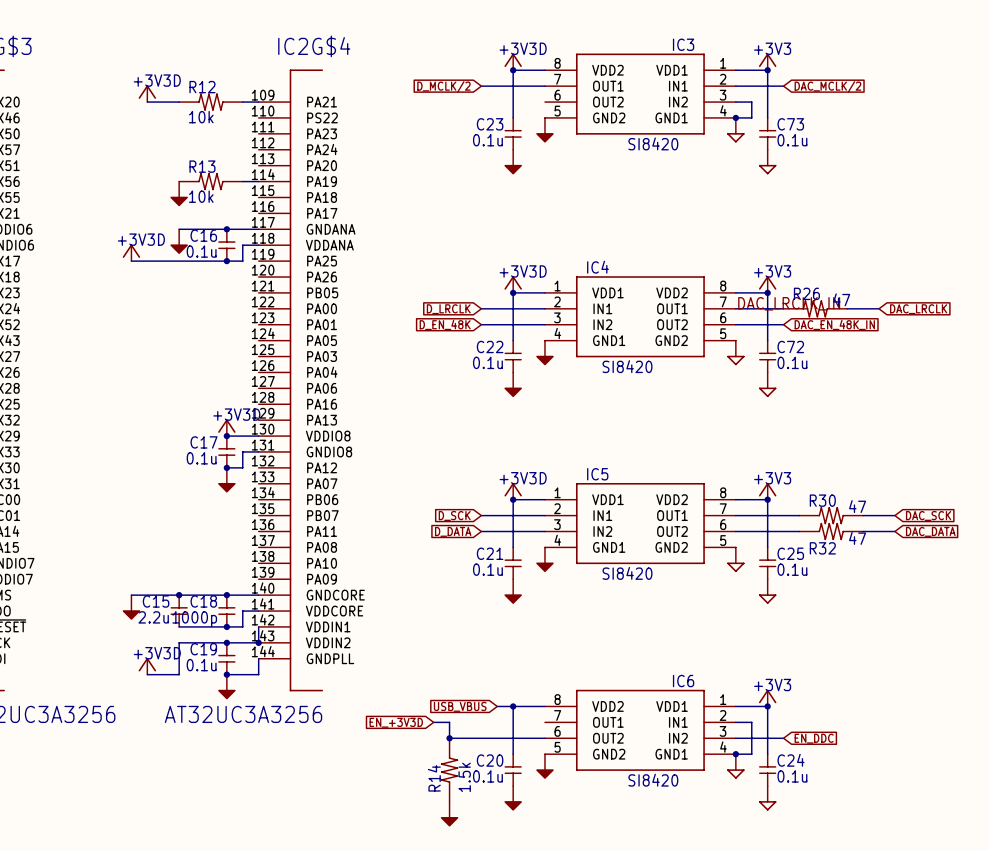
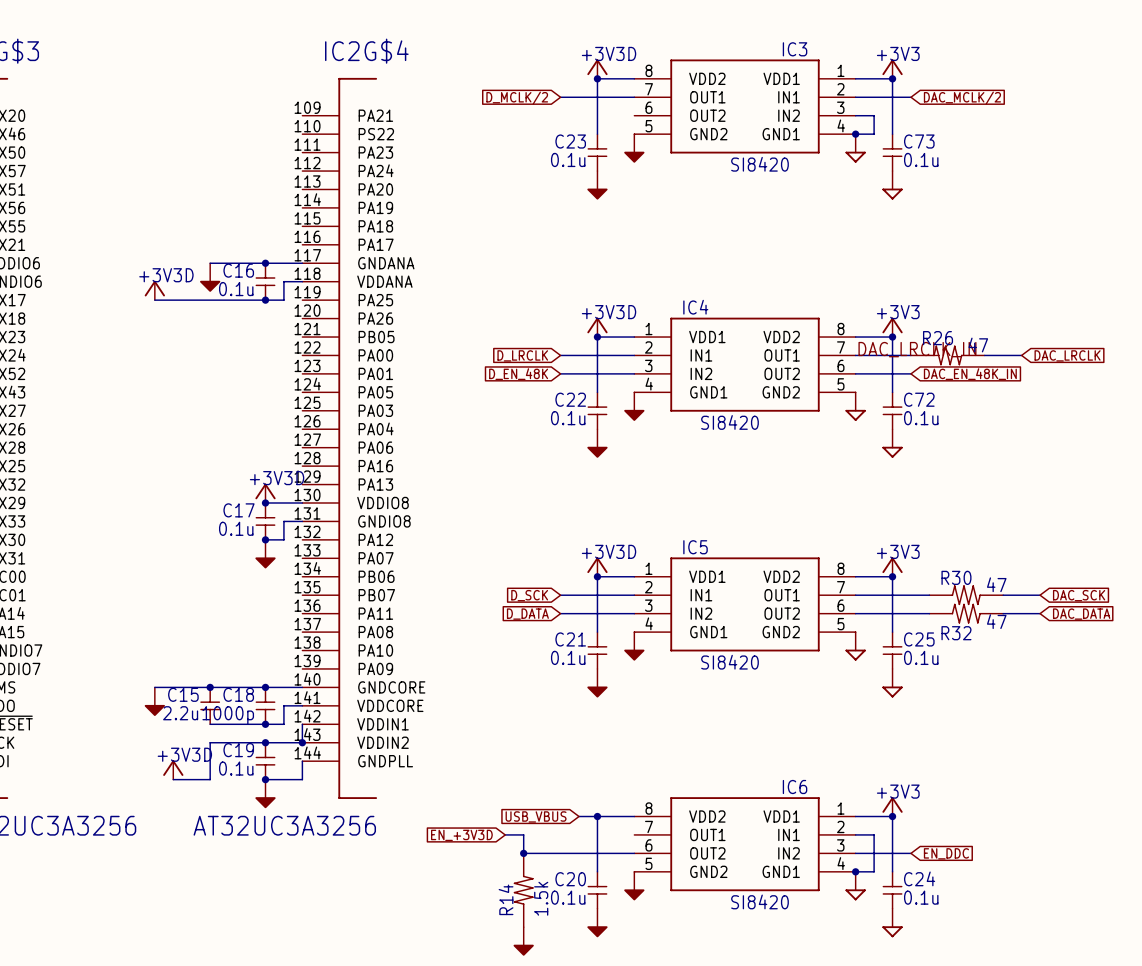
power symbol: +3V3D (147, 93) -> none
wire: (147, 102) (179, 102) -> none
R12: 10k (210, 102) -> none
wire: (242, 102) (258, 102) -> none
R13: 10k (210, 181) -> none
wire: (242, 181) (258, 181) -> none
power symbol: (179, 193) -> none

